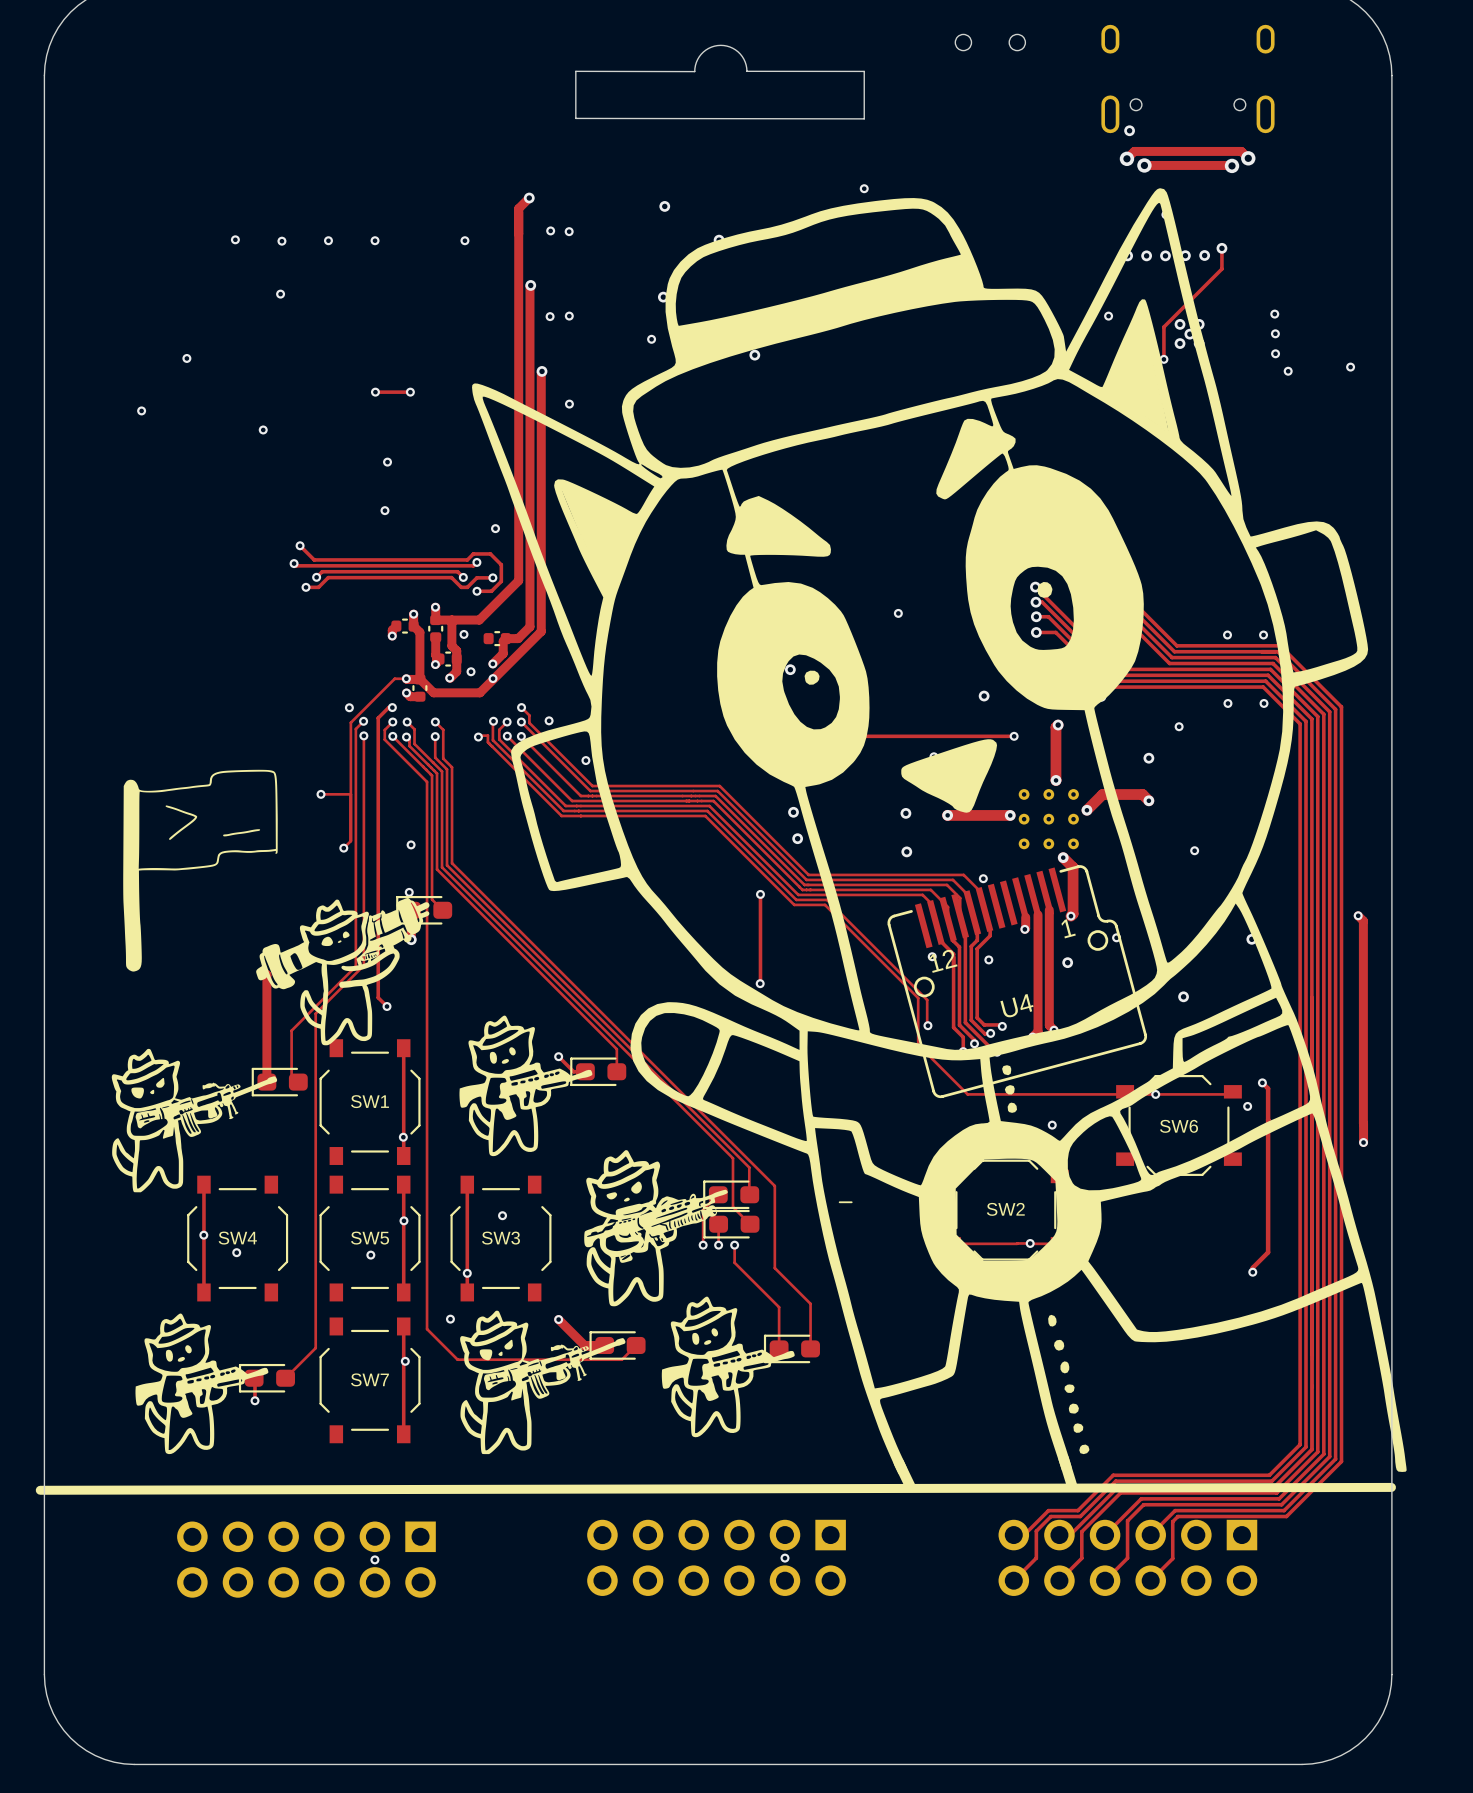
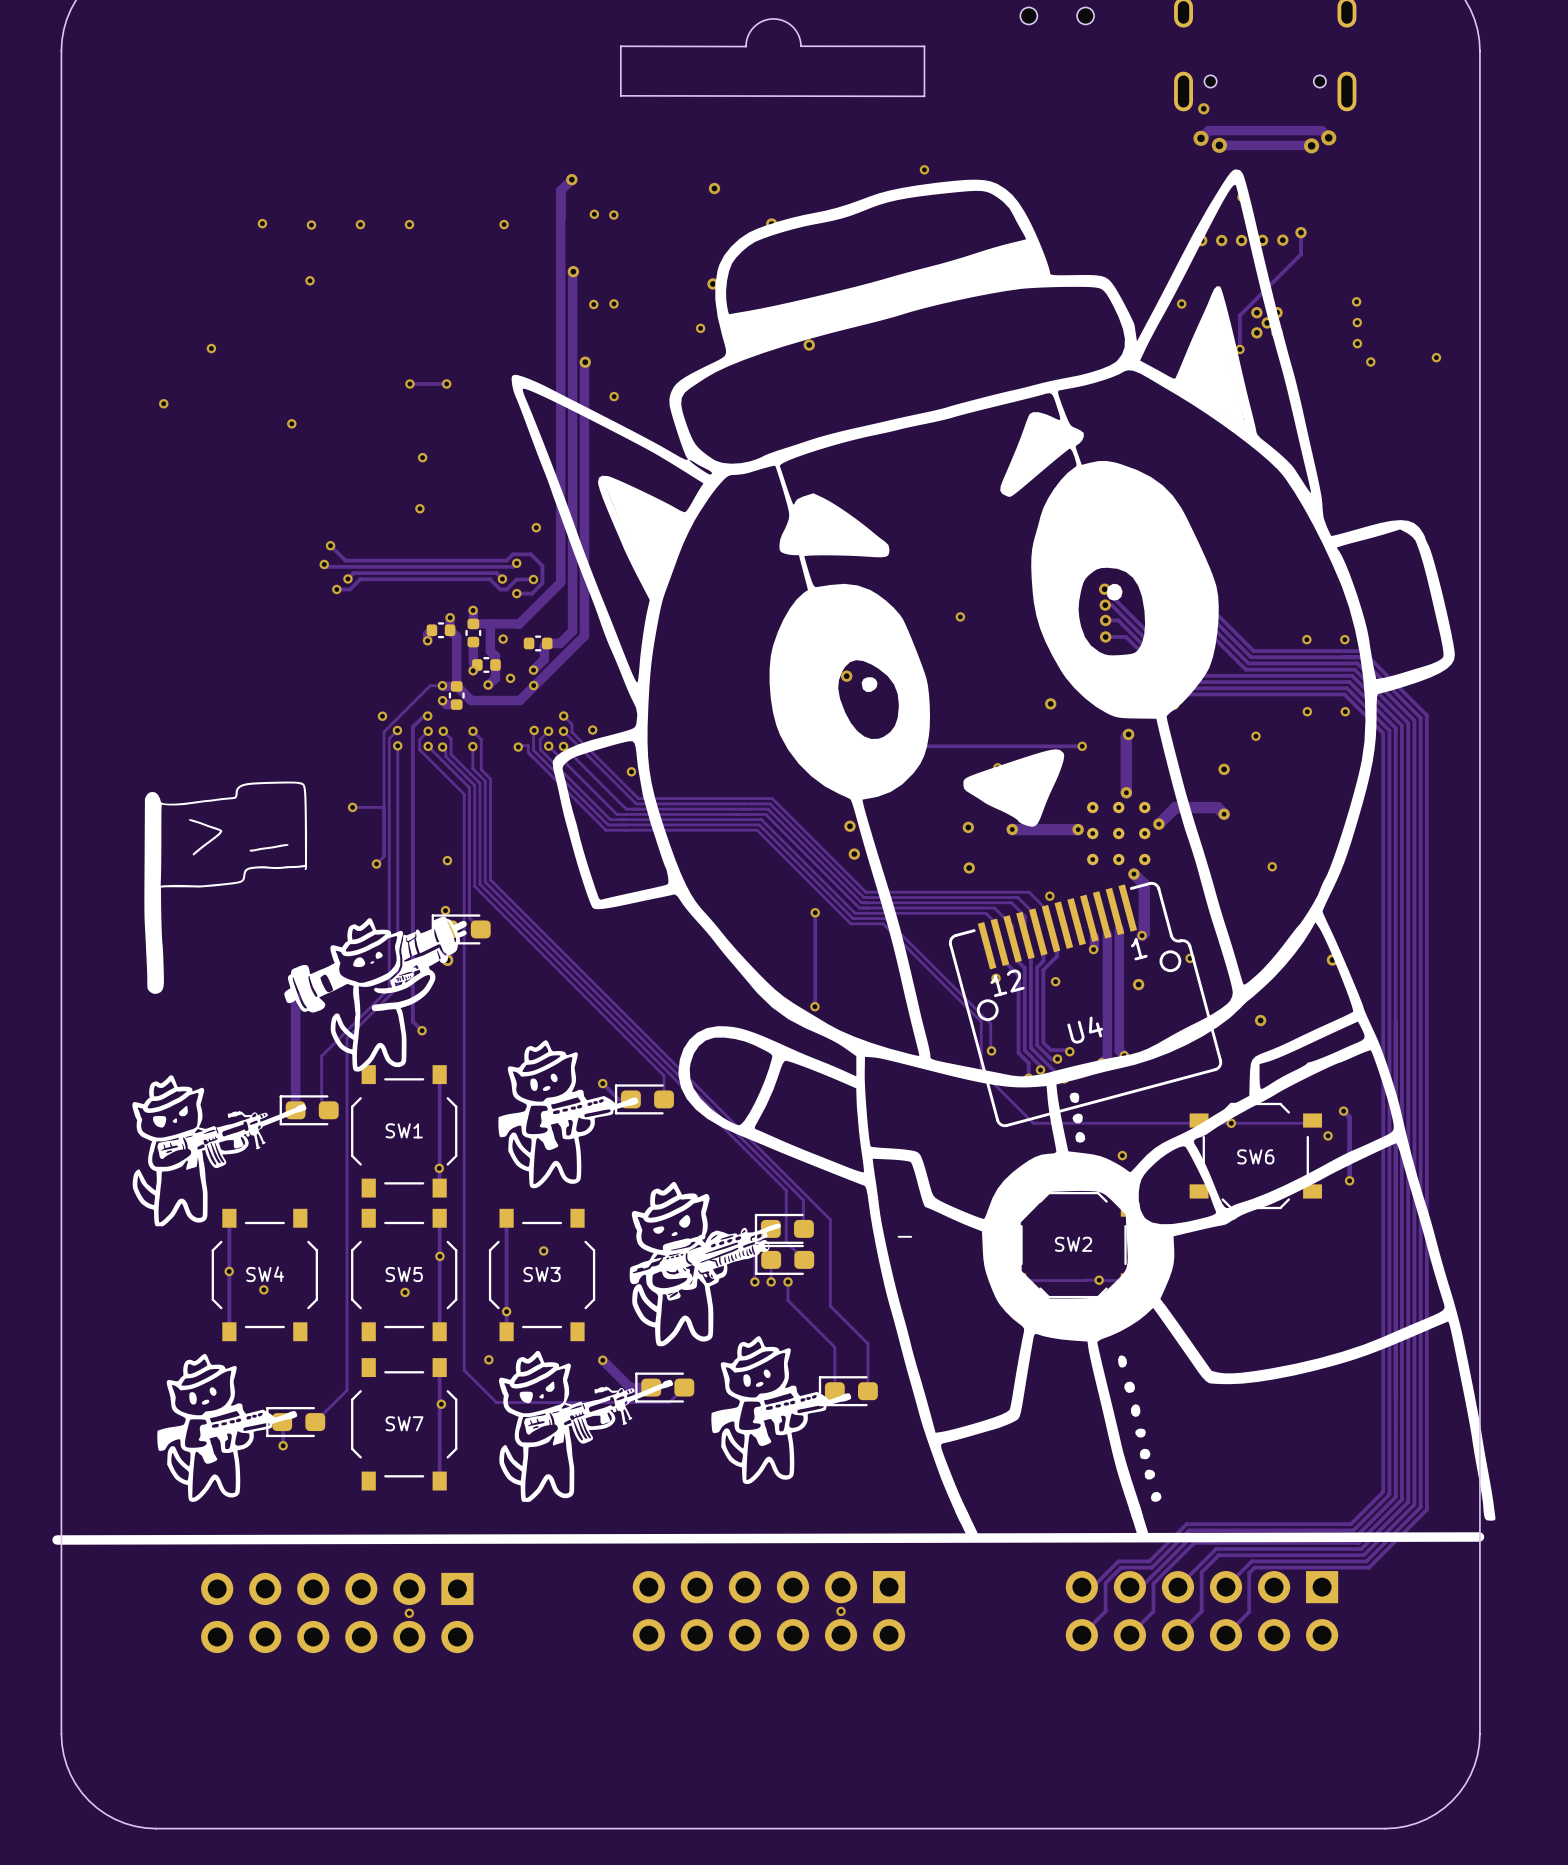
track: (1358, 915) (1363, 920) (1363, 1123) -> none
via: (1358, 915) -> none
track: (1363, 1123) (1363, 1142) -> none
via: (1363, 1142) -> none
track: (1268, 1149) (1268, 1252) (1252, 1267) (1252, 1272) -> none
via: none -> (1349, 1180)
via: (1252, 1272) -> none

